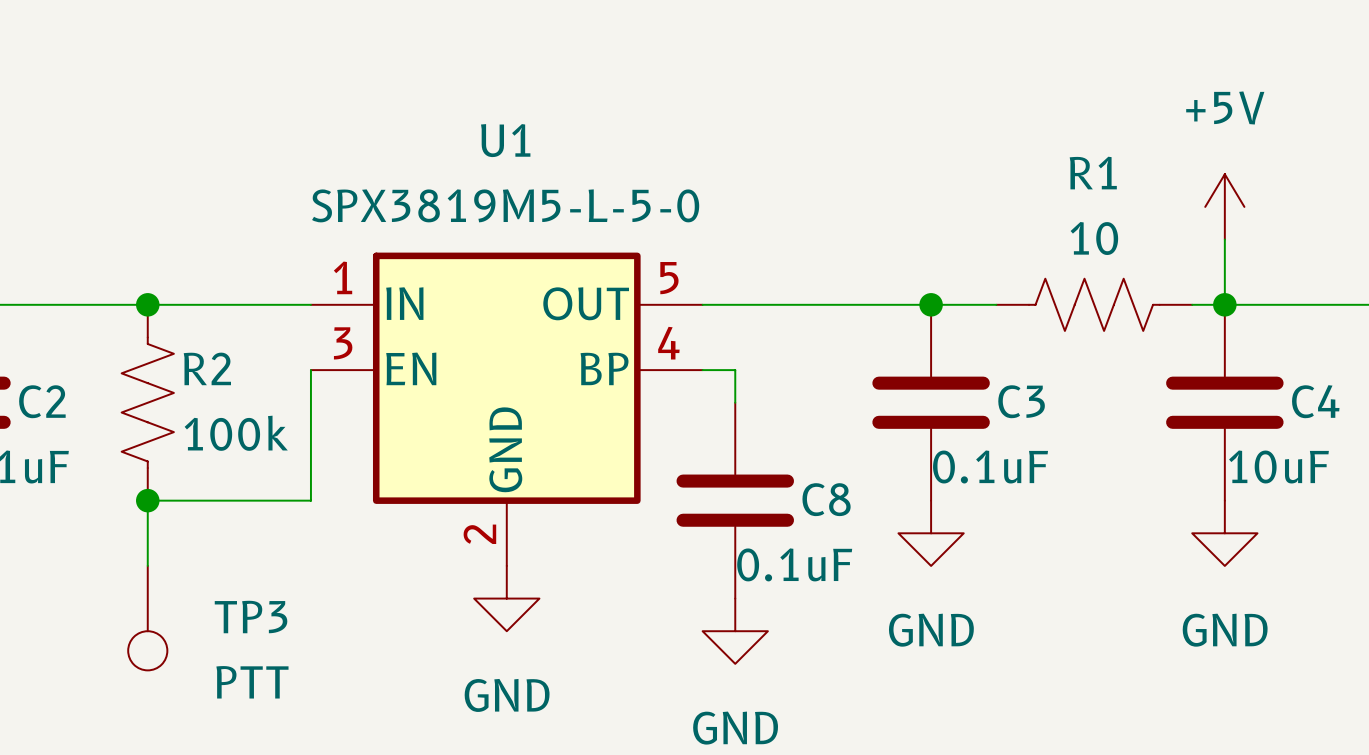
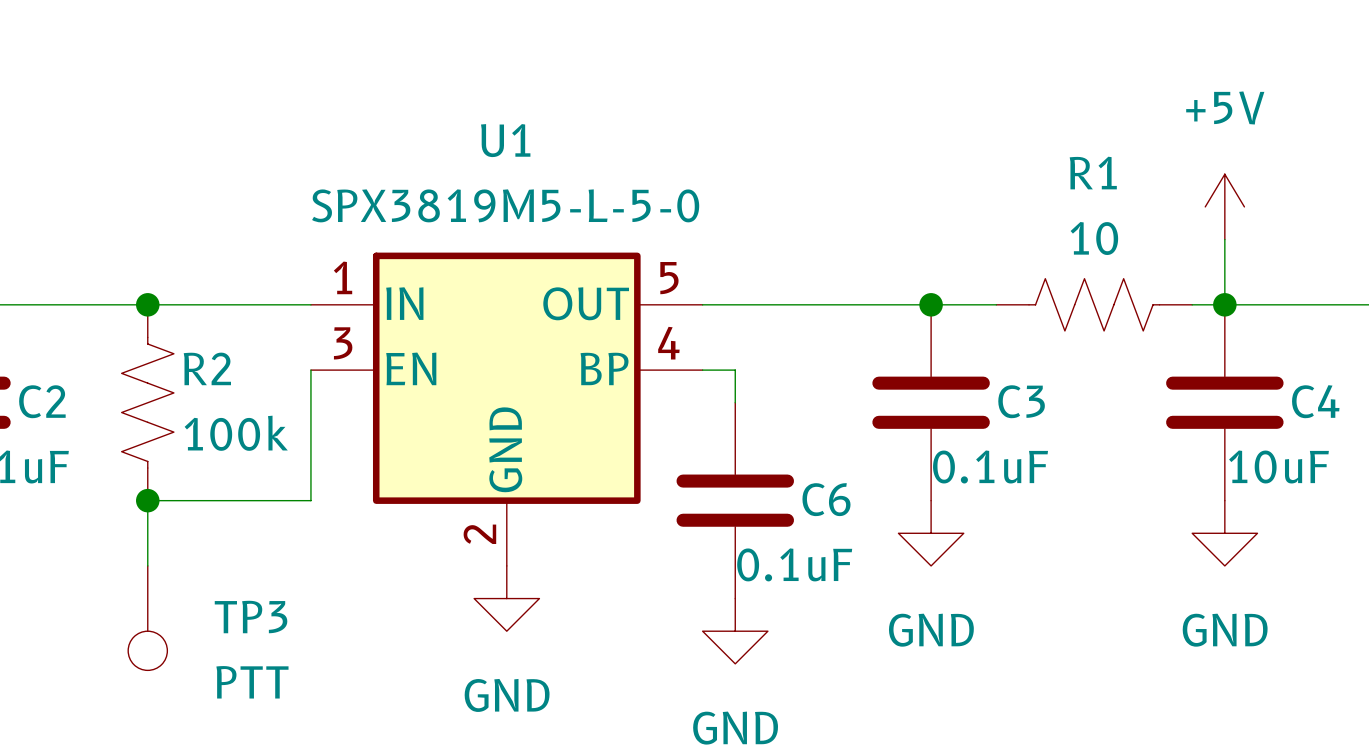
C8 name: C8 (826, 499) -> C6 (826, 499)

